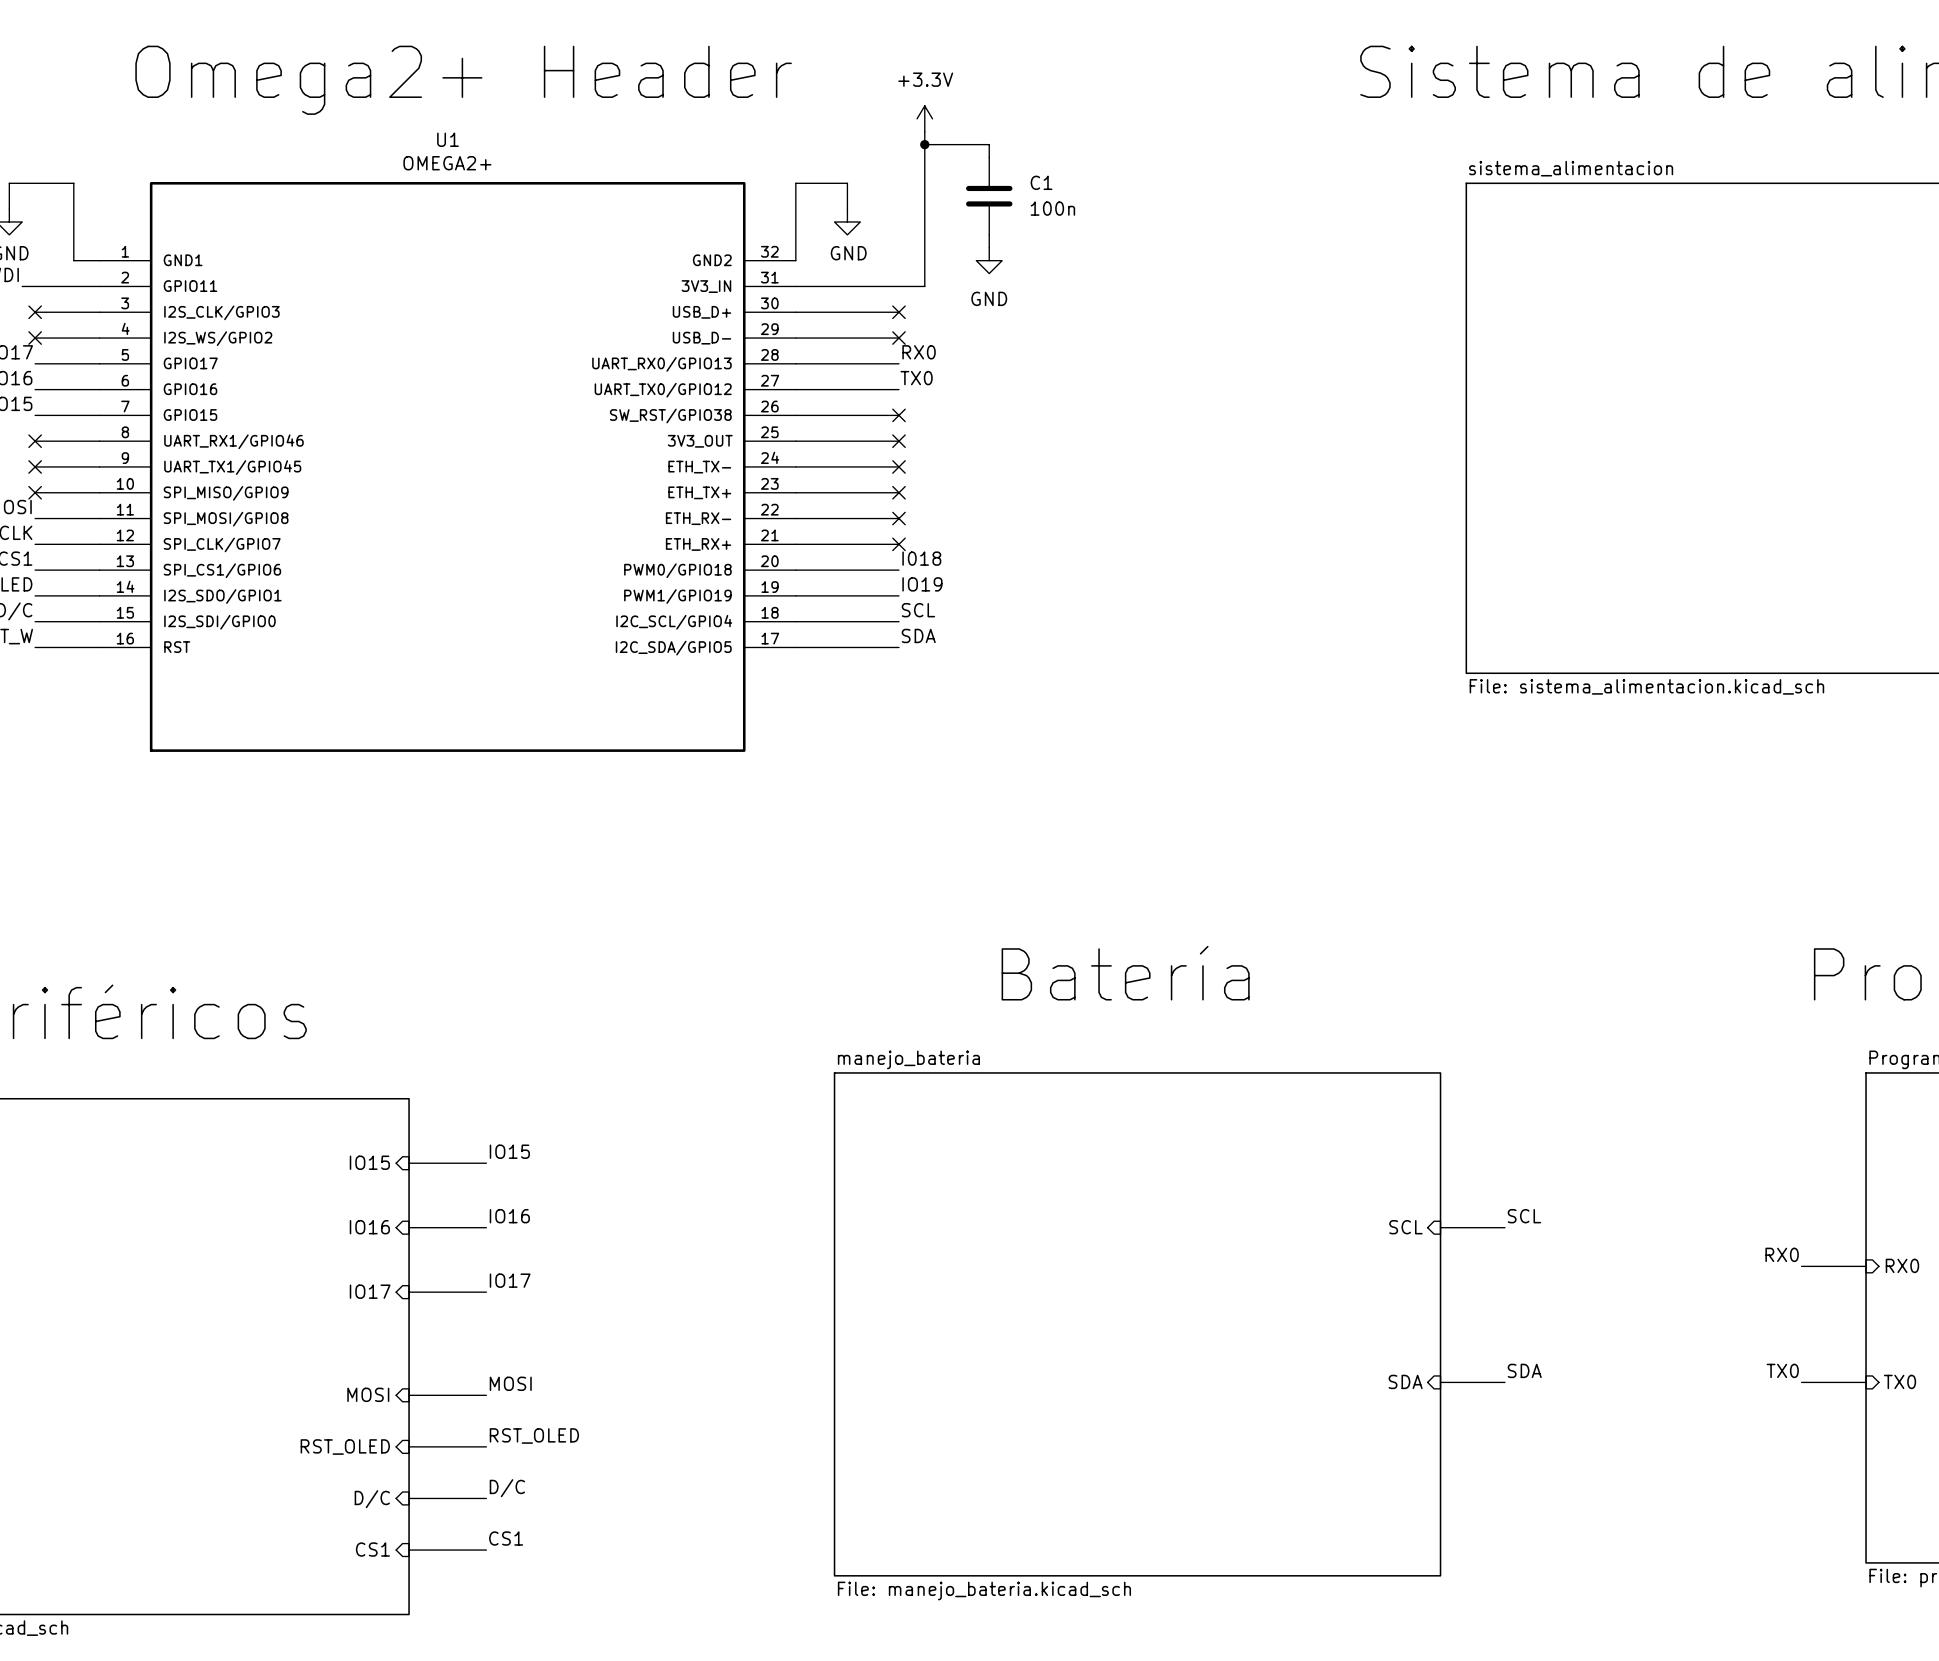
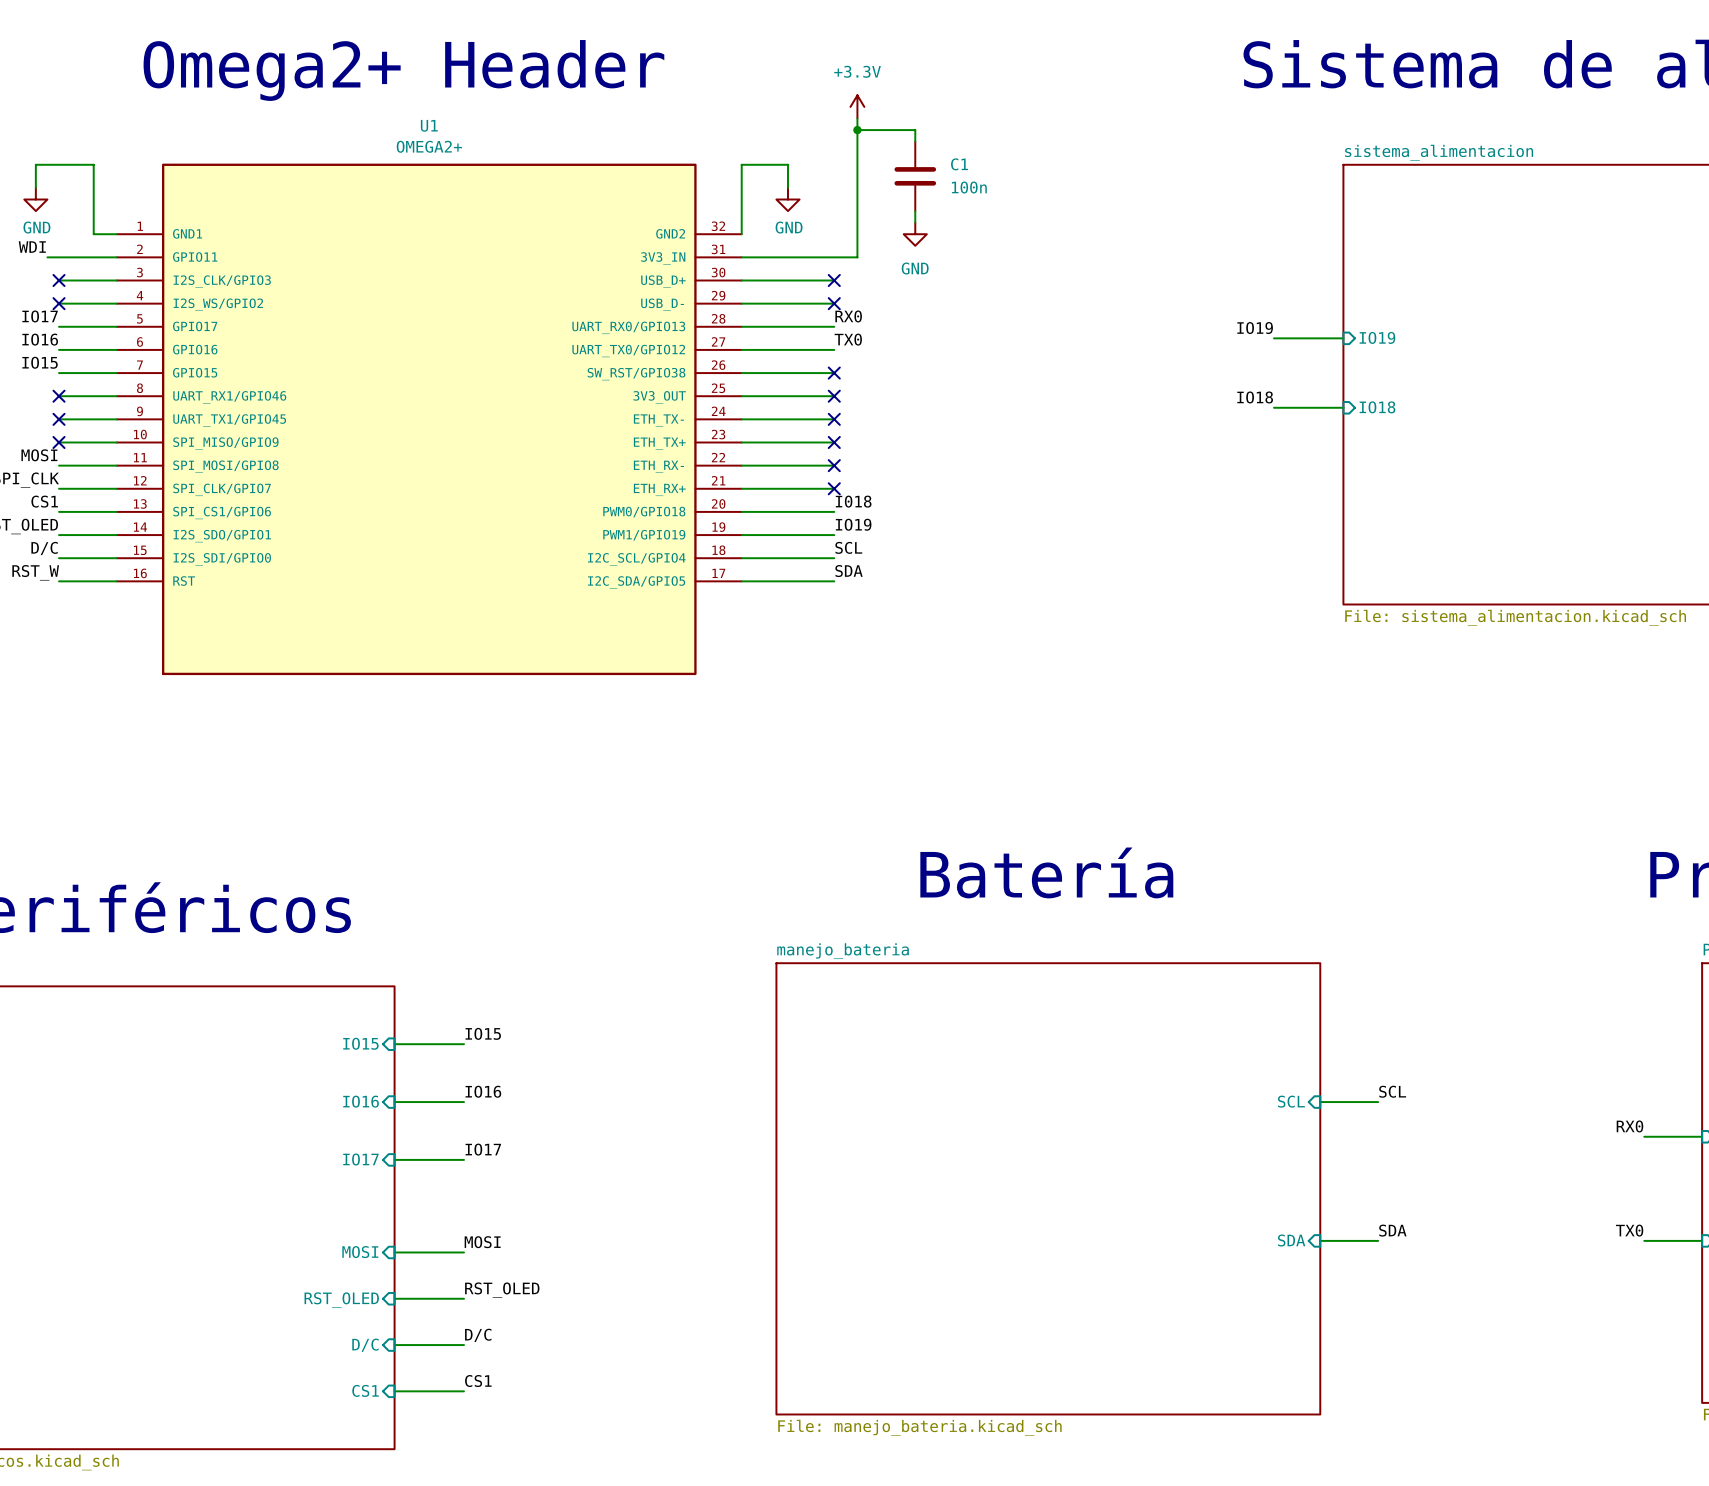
label: none -> IO19 (1255, 328)
wire: none -> (1273, 338) (1343, 338)
sheet pin: none -> IO19 (1377, 337)
label: none -> IO18 (1255, 397)
sheet pin: none -> IO18 (1377, 407)
wire: none -> (1273, 407) (1343, 407)

